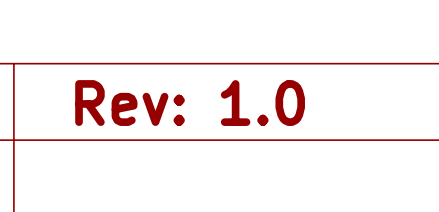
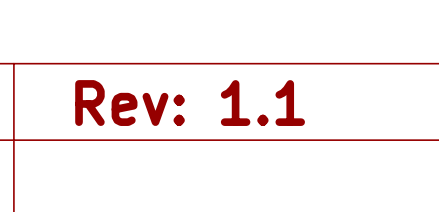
title block: Rev: 1.0 (190, 103) -> Rev: 1.1 (190, 103)

